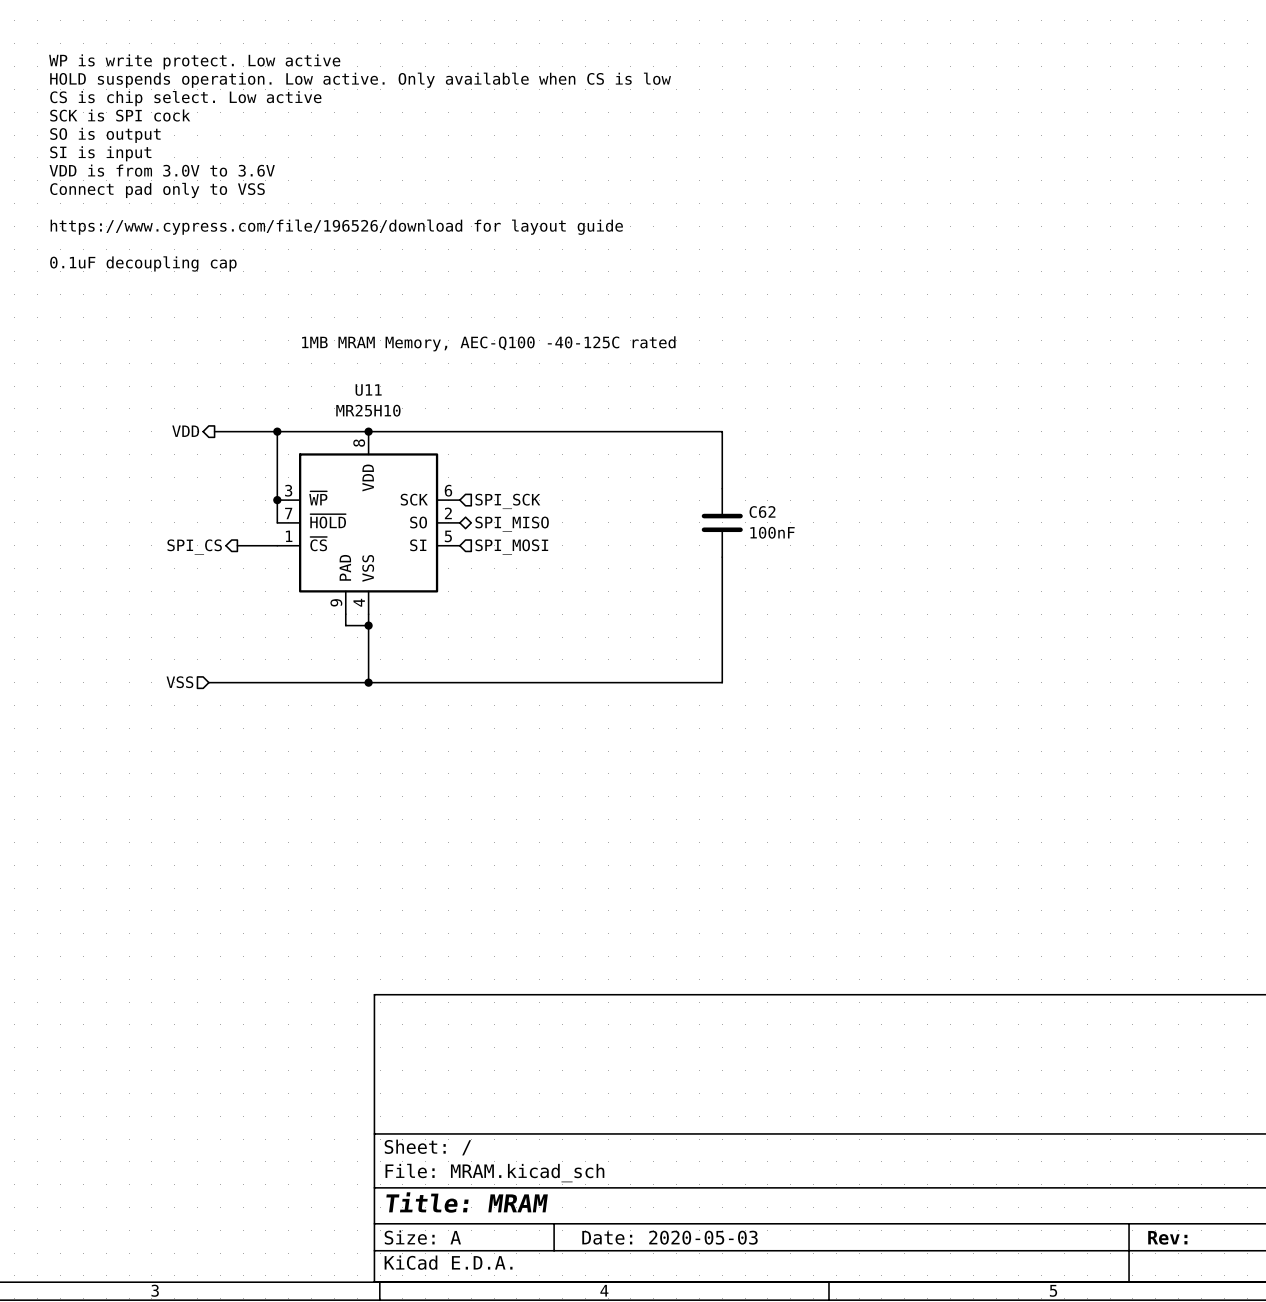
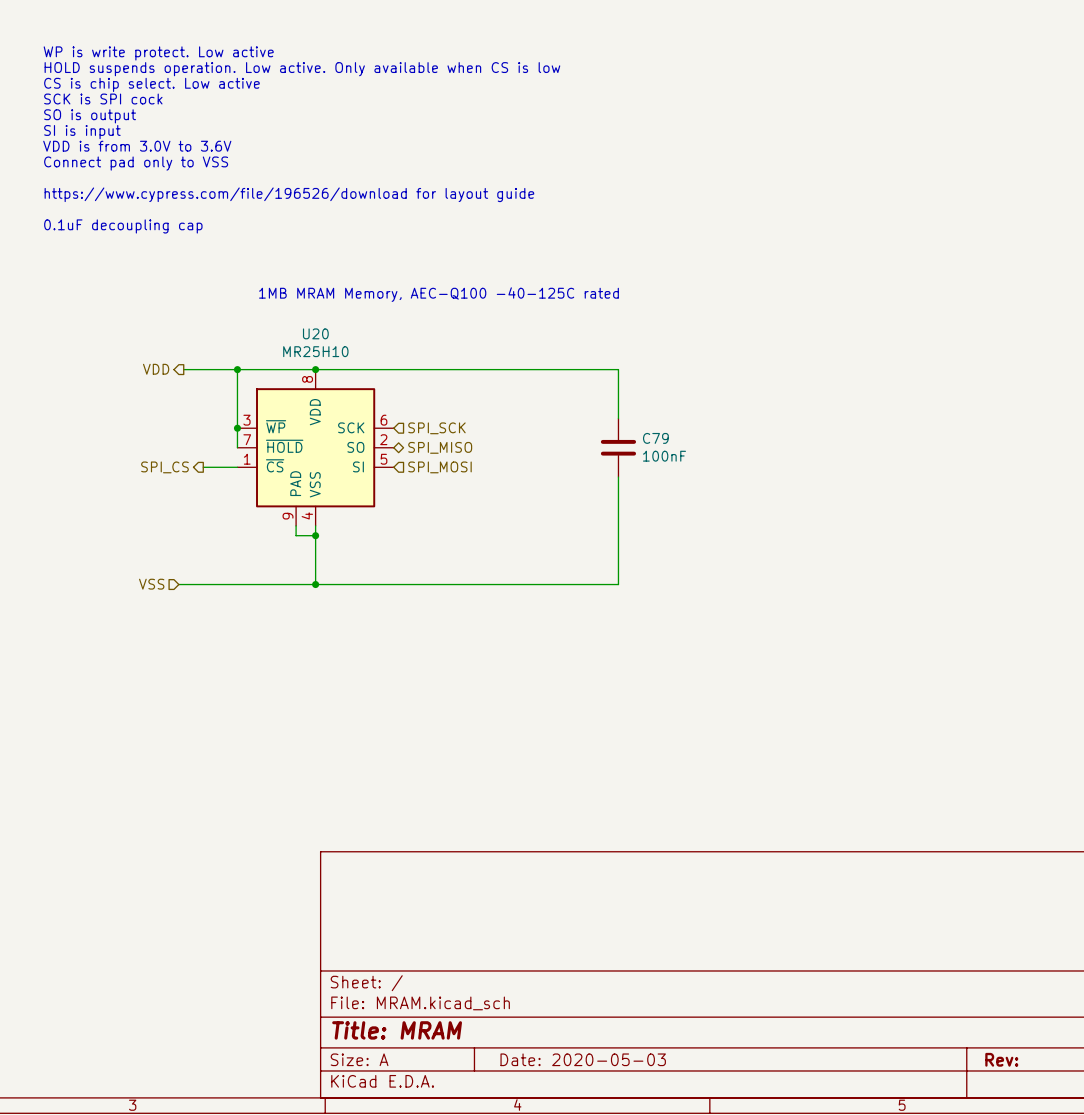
U11 name: U11 (368, 390) -> U20 (315, 333)
C62 name: C62 (762, 512) -> C79 (655, 438)

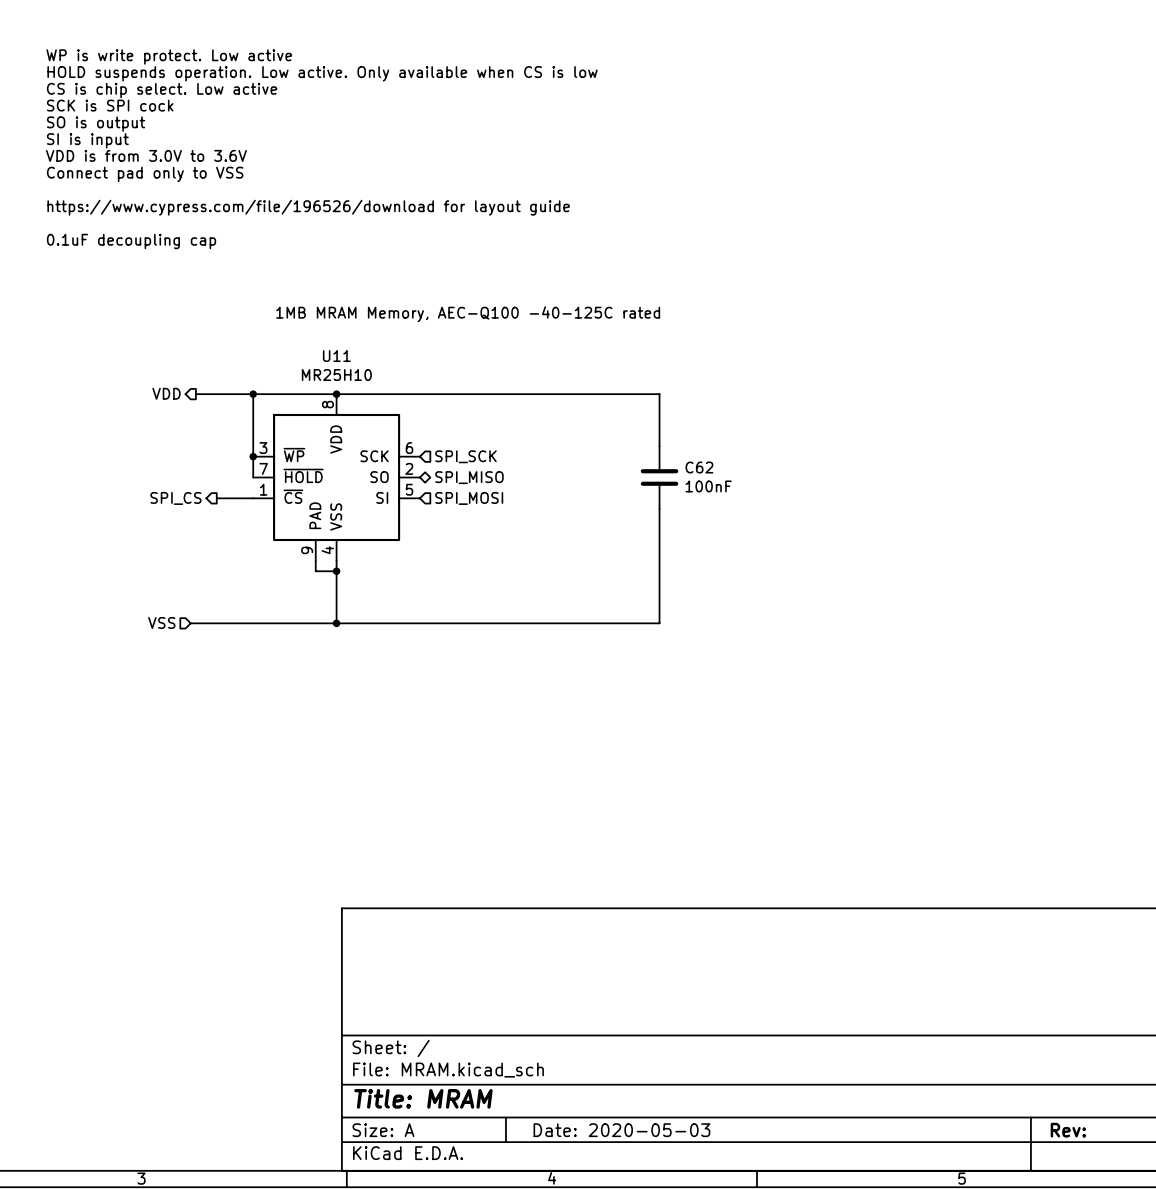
U20 name: U20 (315, 333) -> U11 (336, 356)
C79 name: C79 (655, 438) -> C62 (699, 467)

